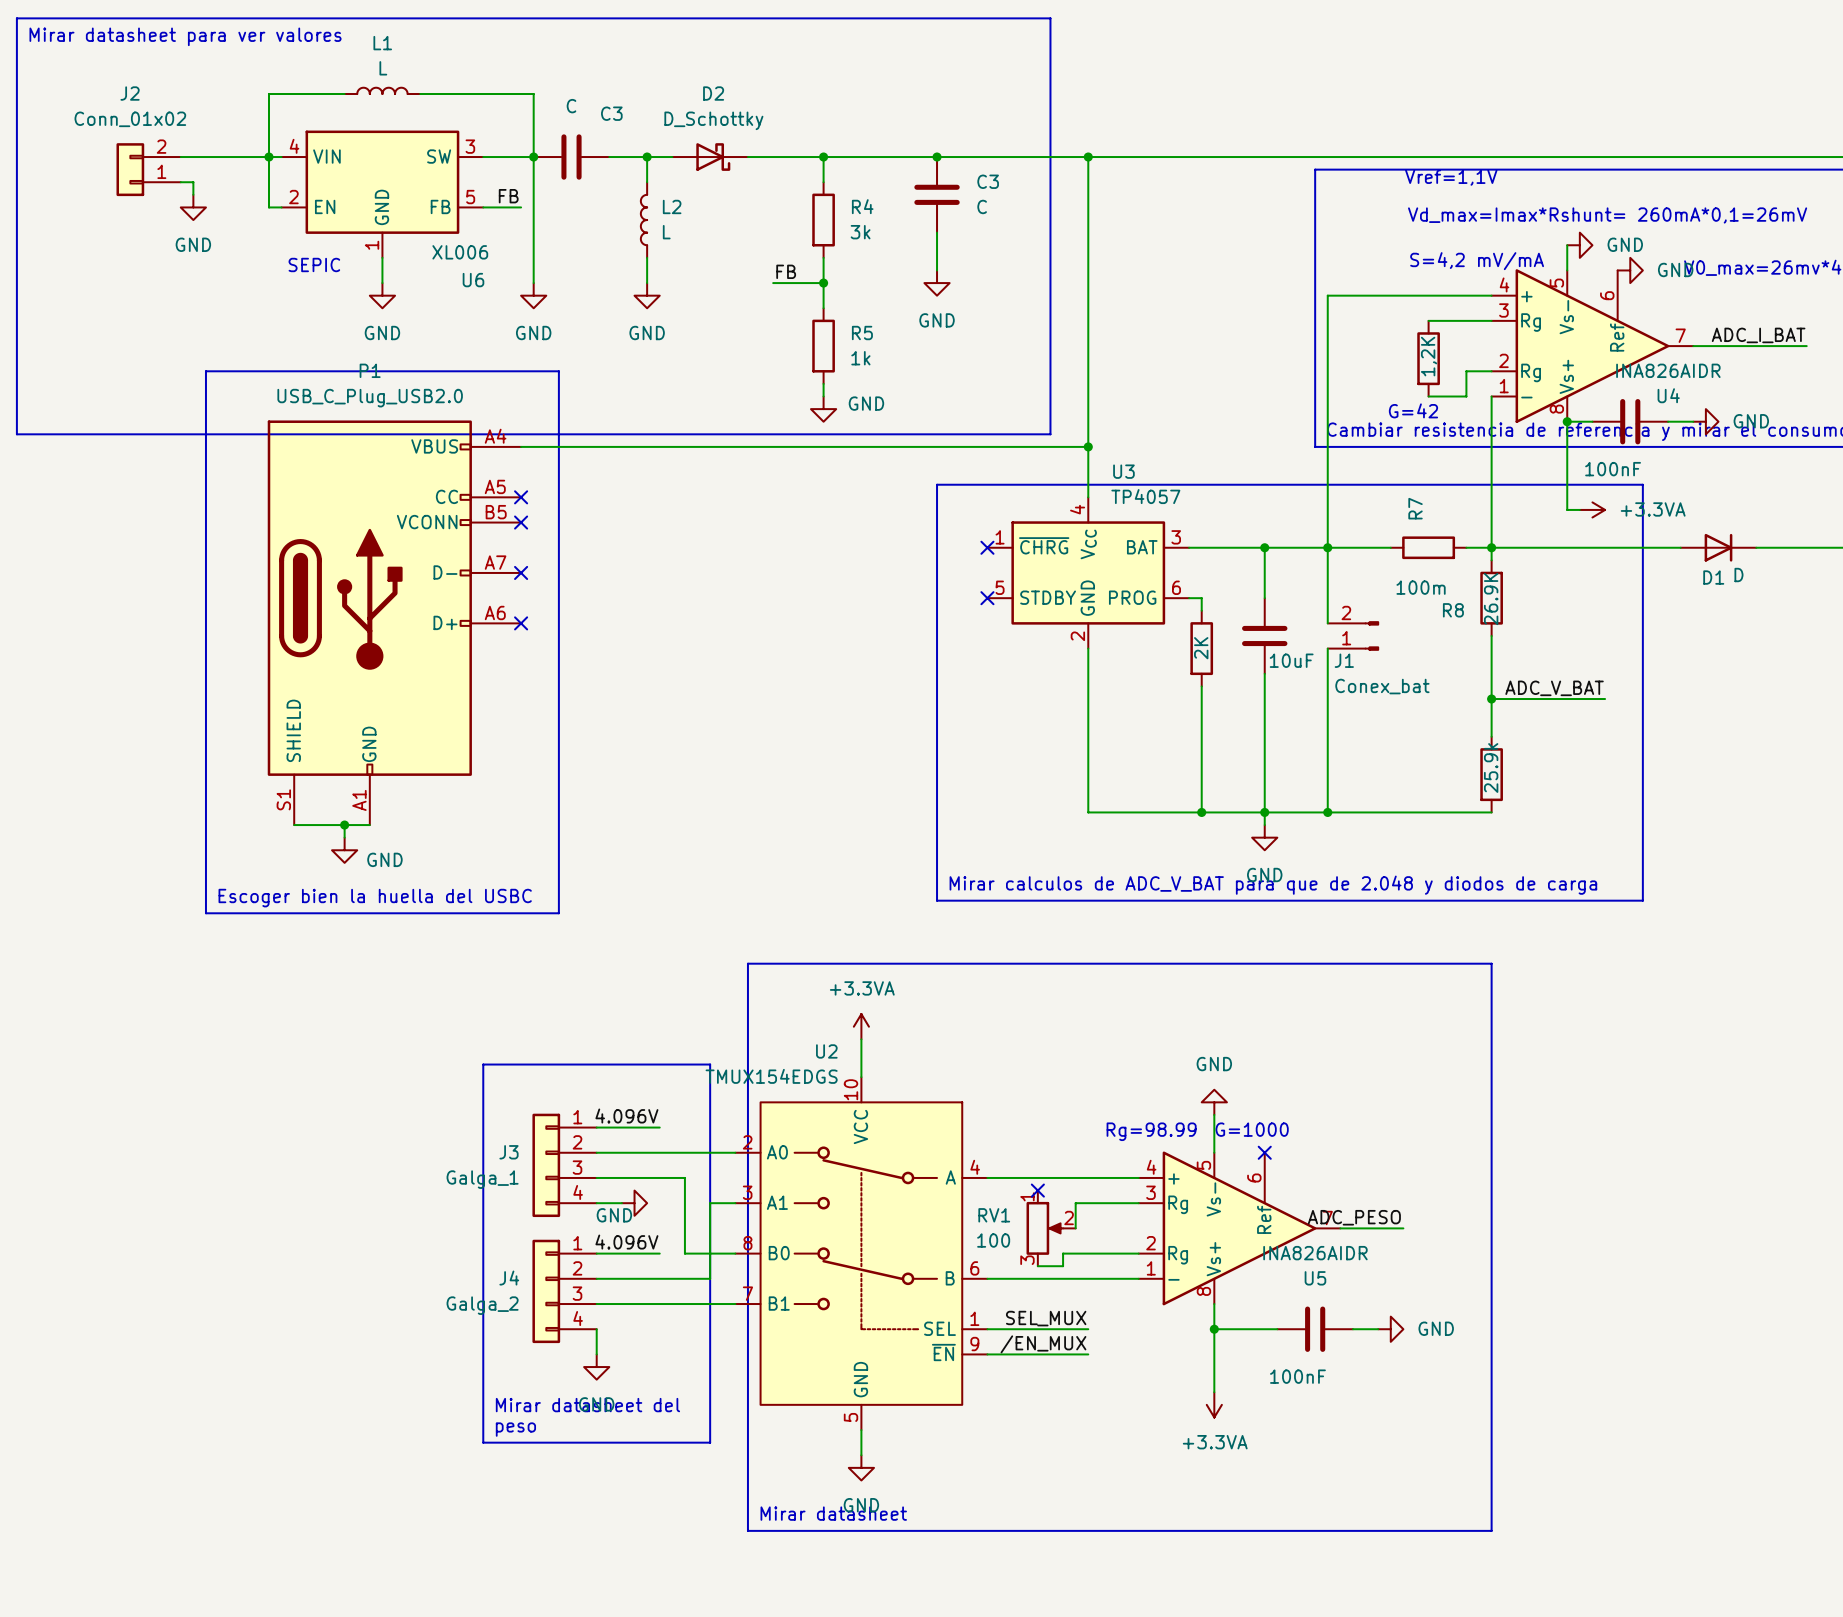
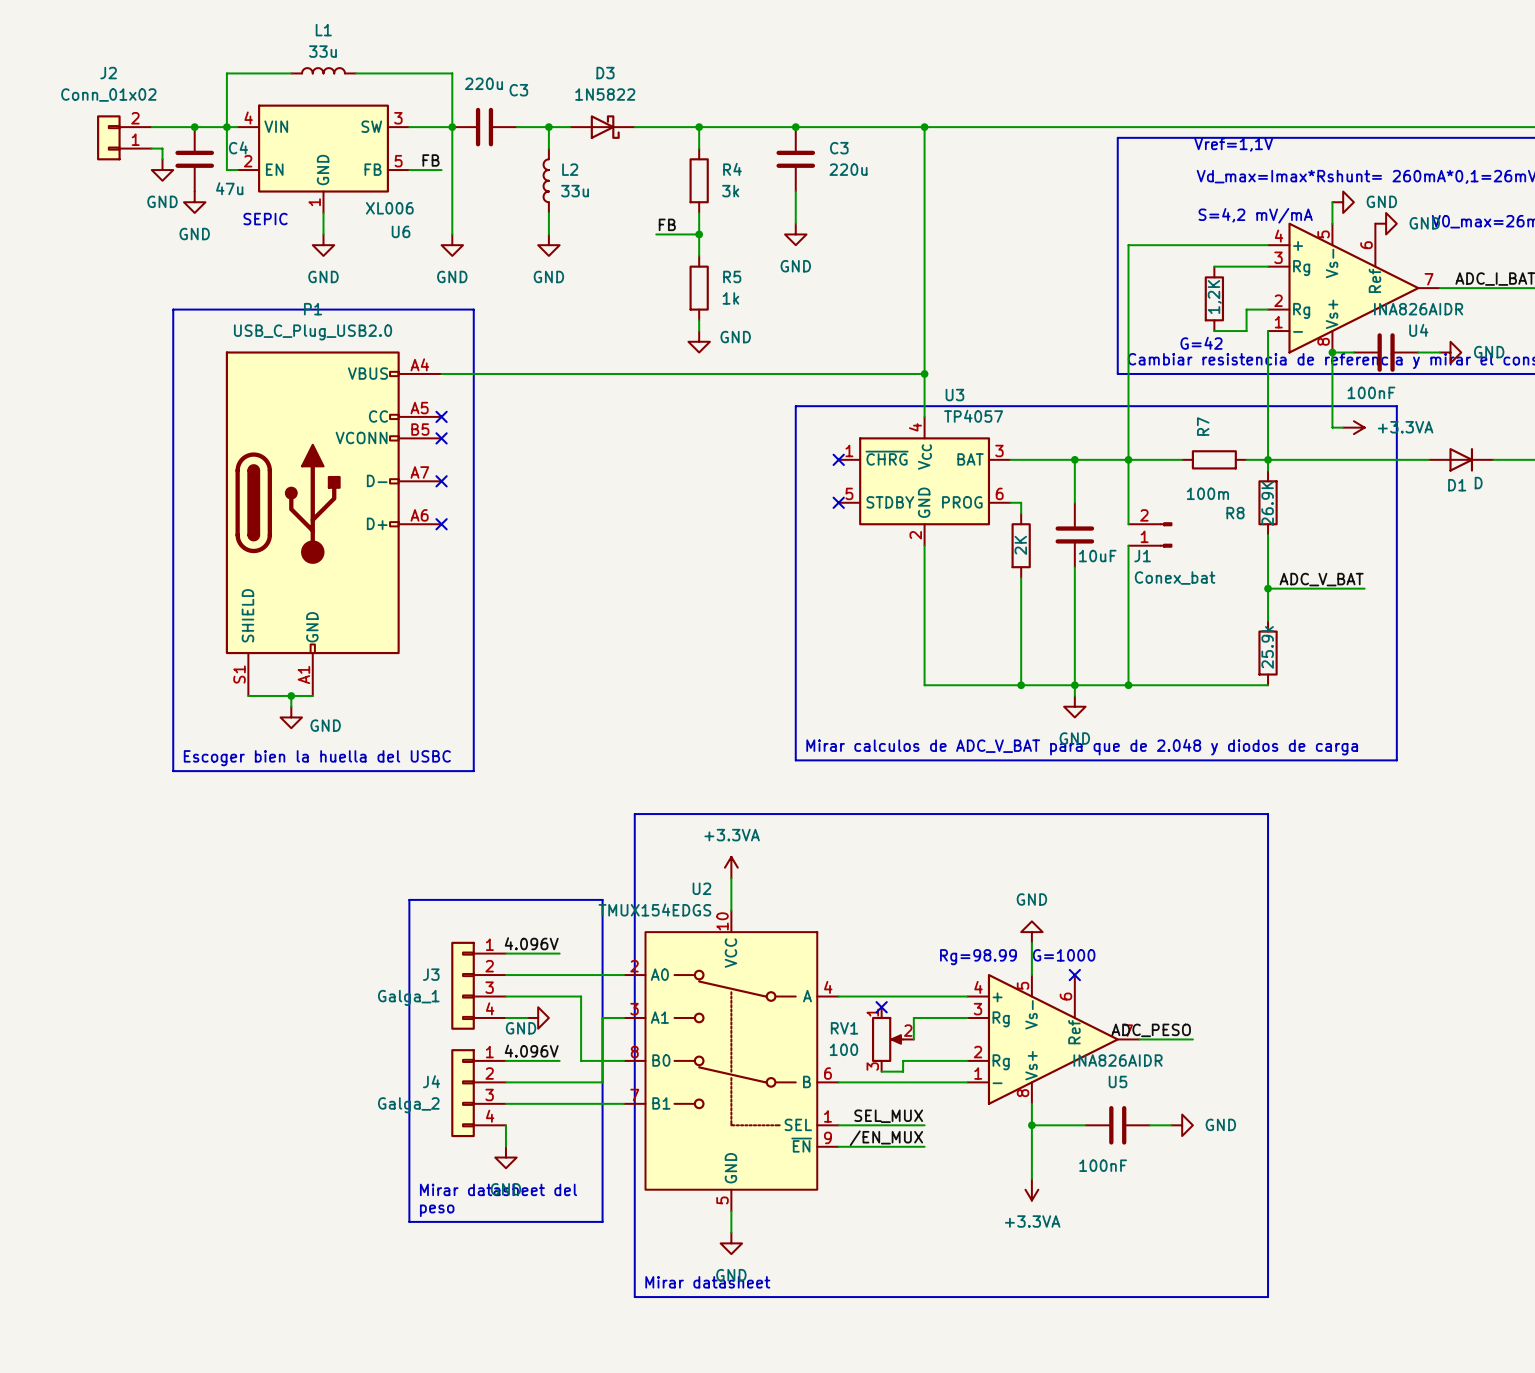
line: (16, 18) (1050, 18) (1050, 434) (16, 434) (16, 18) -> none
text: Mirar datasheet para ver valores (185, 36) -> none
L1 value: L (383, 68) -> 33u (322, 51)
D2 name: D2 (713, 93) -> D3 (605, 73)
C3 value: C (571, 106) -> 220u (483, 83)
D2 value: D_Schottky (713, 120) -> 1N5822 (605, 94)
junction: none -> (194, 127)
C4: none -> 47u (194, 159)
C3 value: C (982, 206) -> 220u (848, 169)
L2 value: L (666, 232) -> 33u (575, 191)
power symbol: none -> GND (194, 202)

